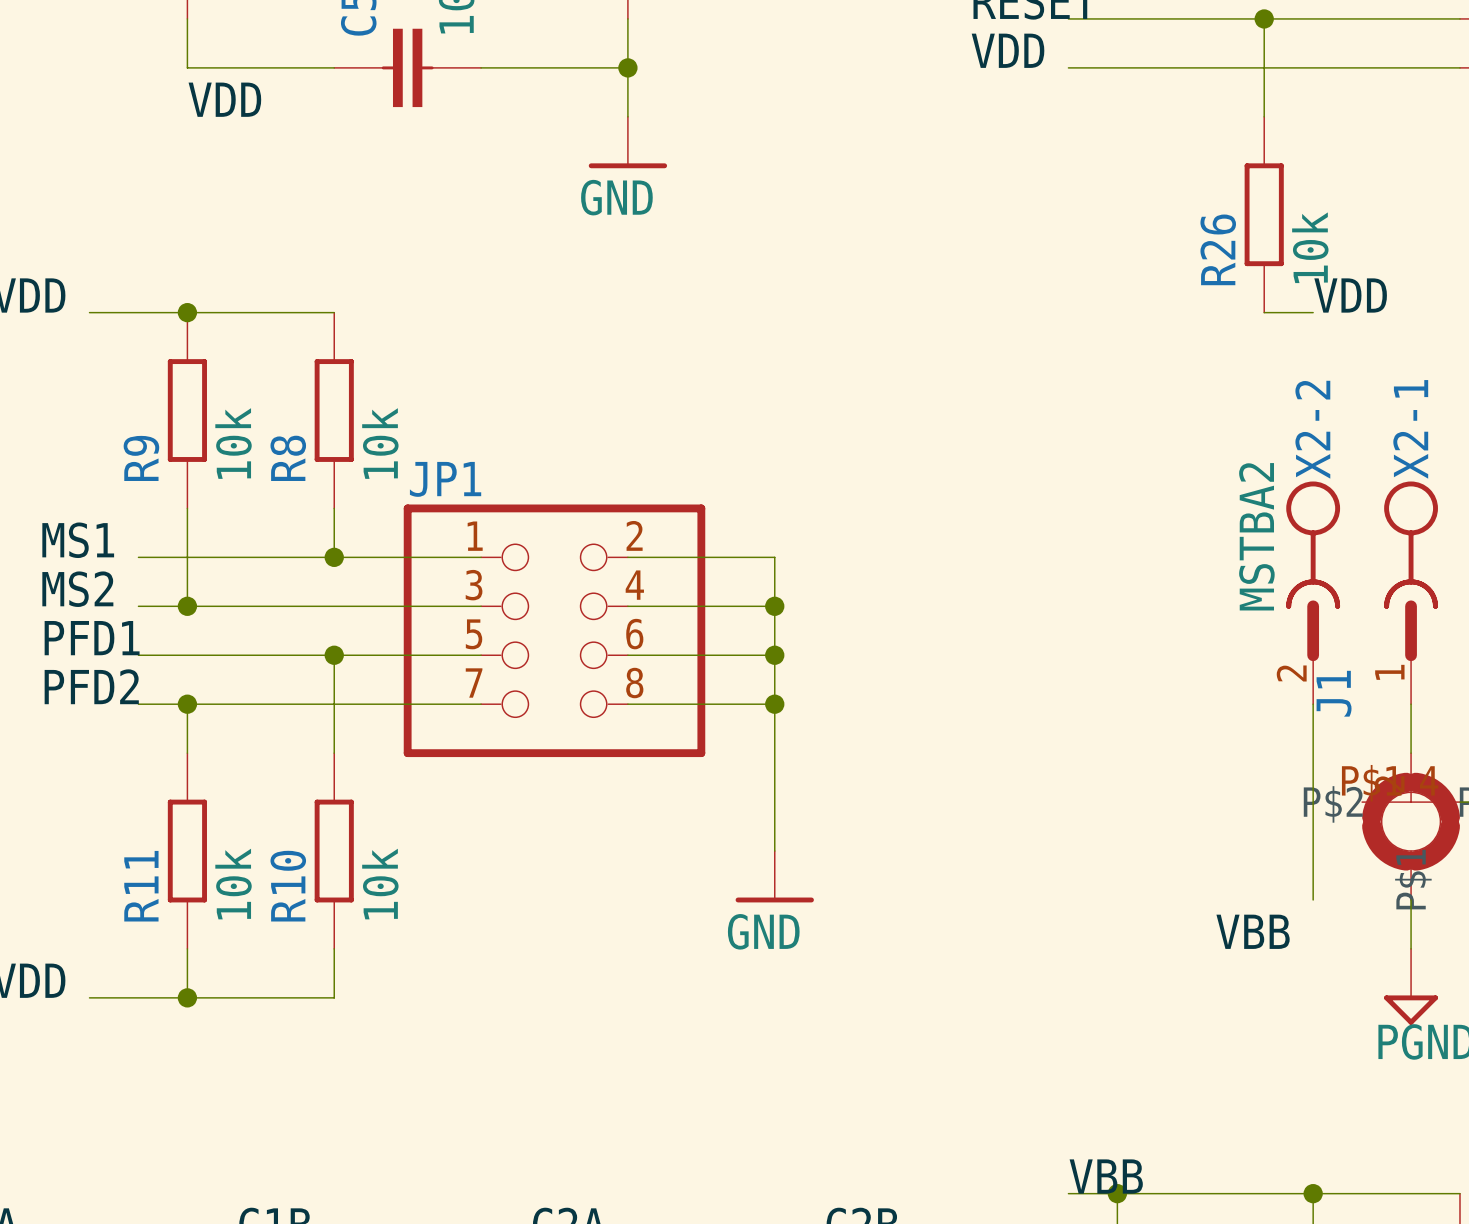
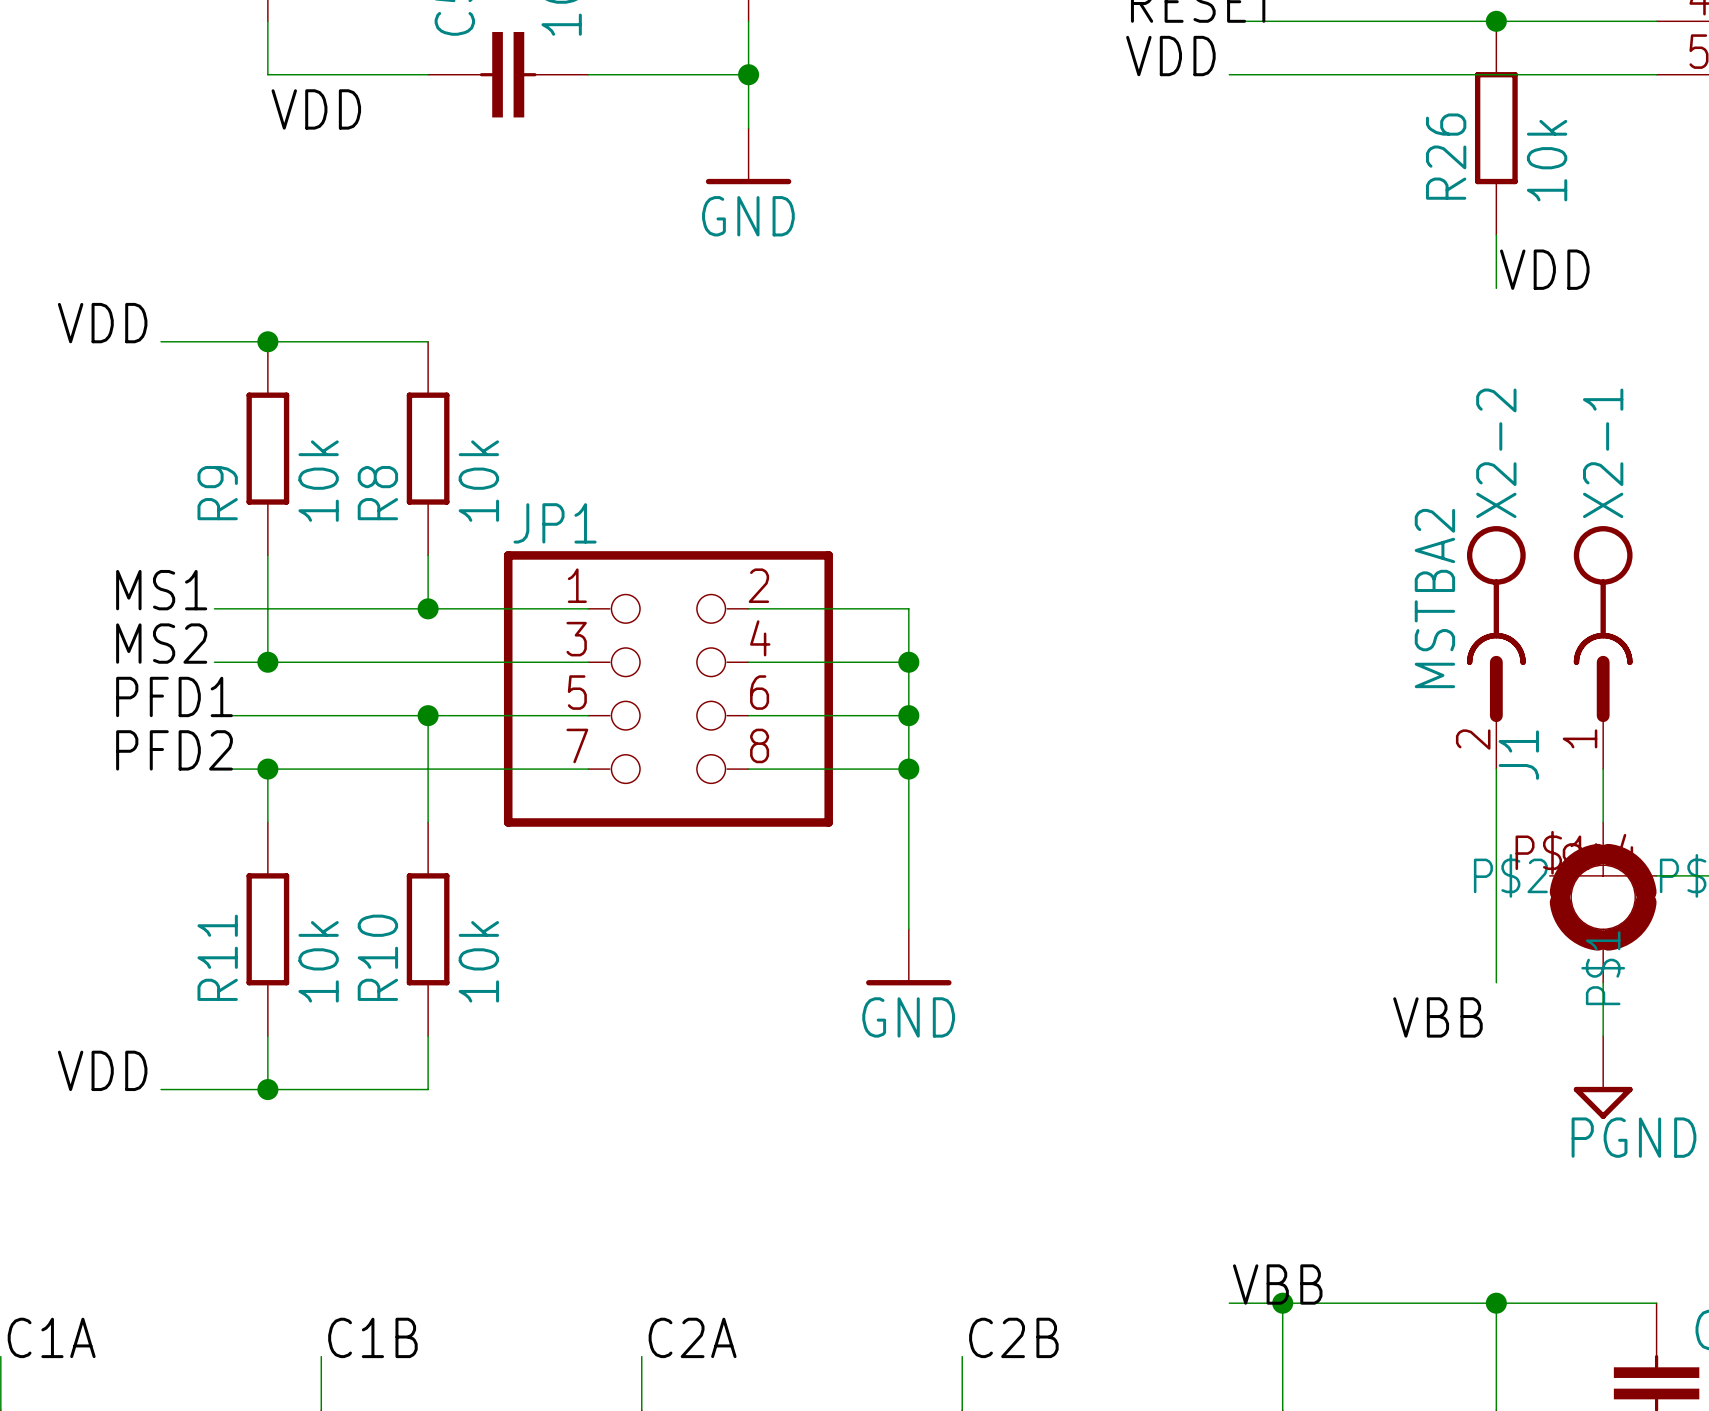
wire: (1264, 18) (1264, 116) -> none
junction position: (1264, 18) -> (1496, 21)
R26 position: (1264, 214) -> (1496, 128)
wire: none -> (1496, 234) (1496, 288)
label position: VDD (1350, 295) -> VDD (1544, 269)
wire: (1264, 312) (1313, 312) -> none

